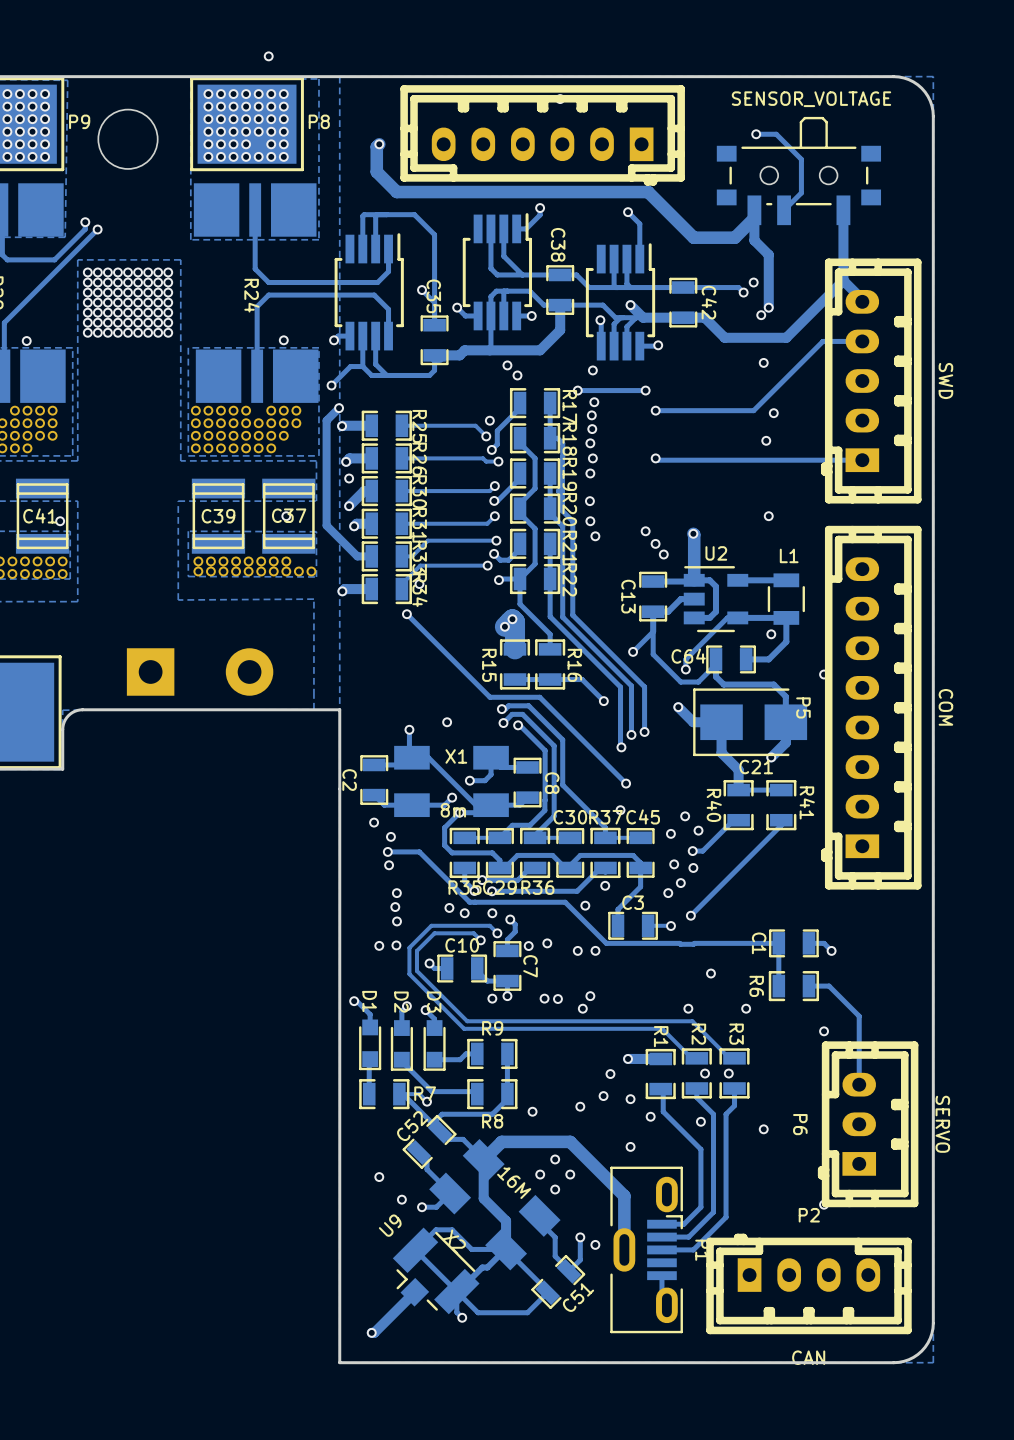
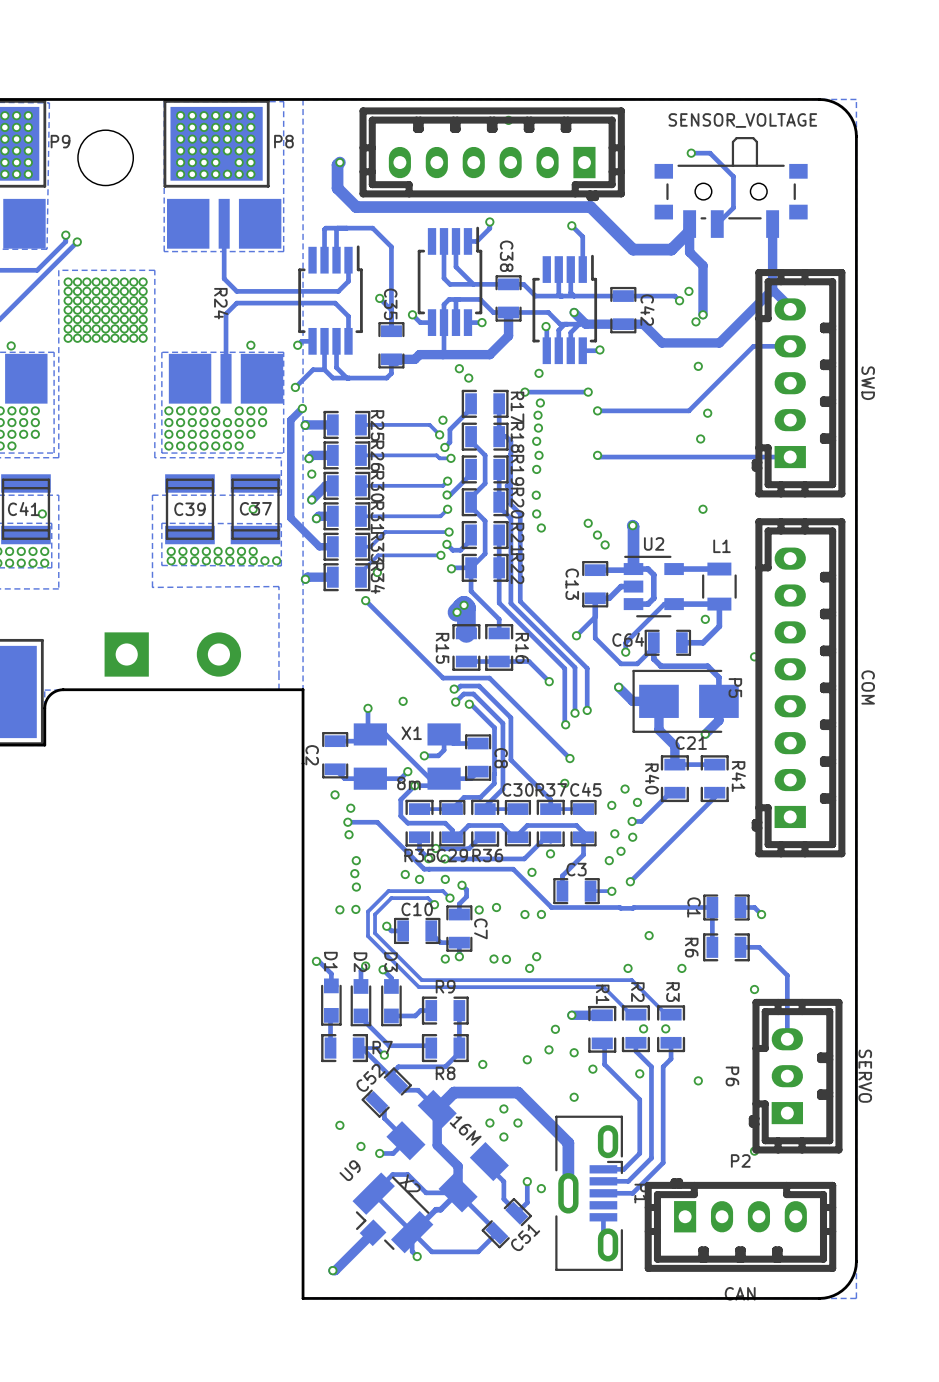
via: (268, 56) -> none

